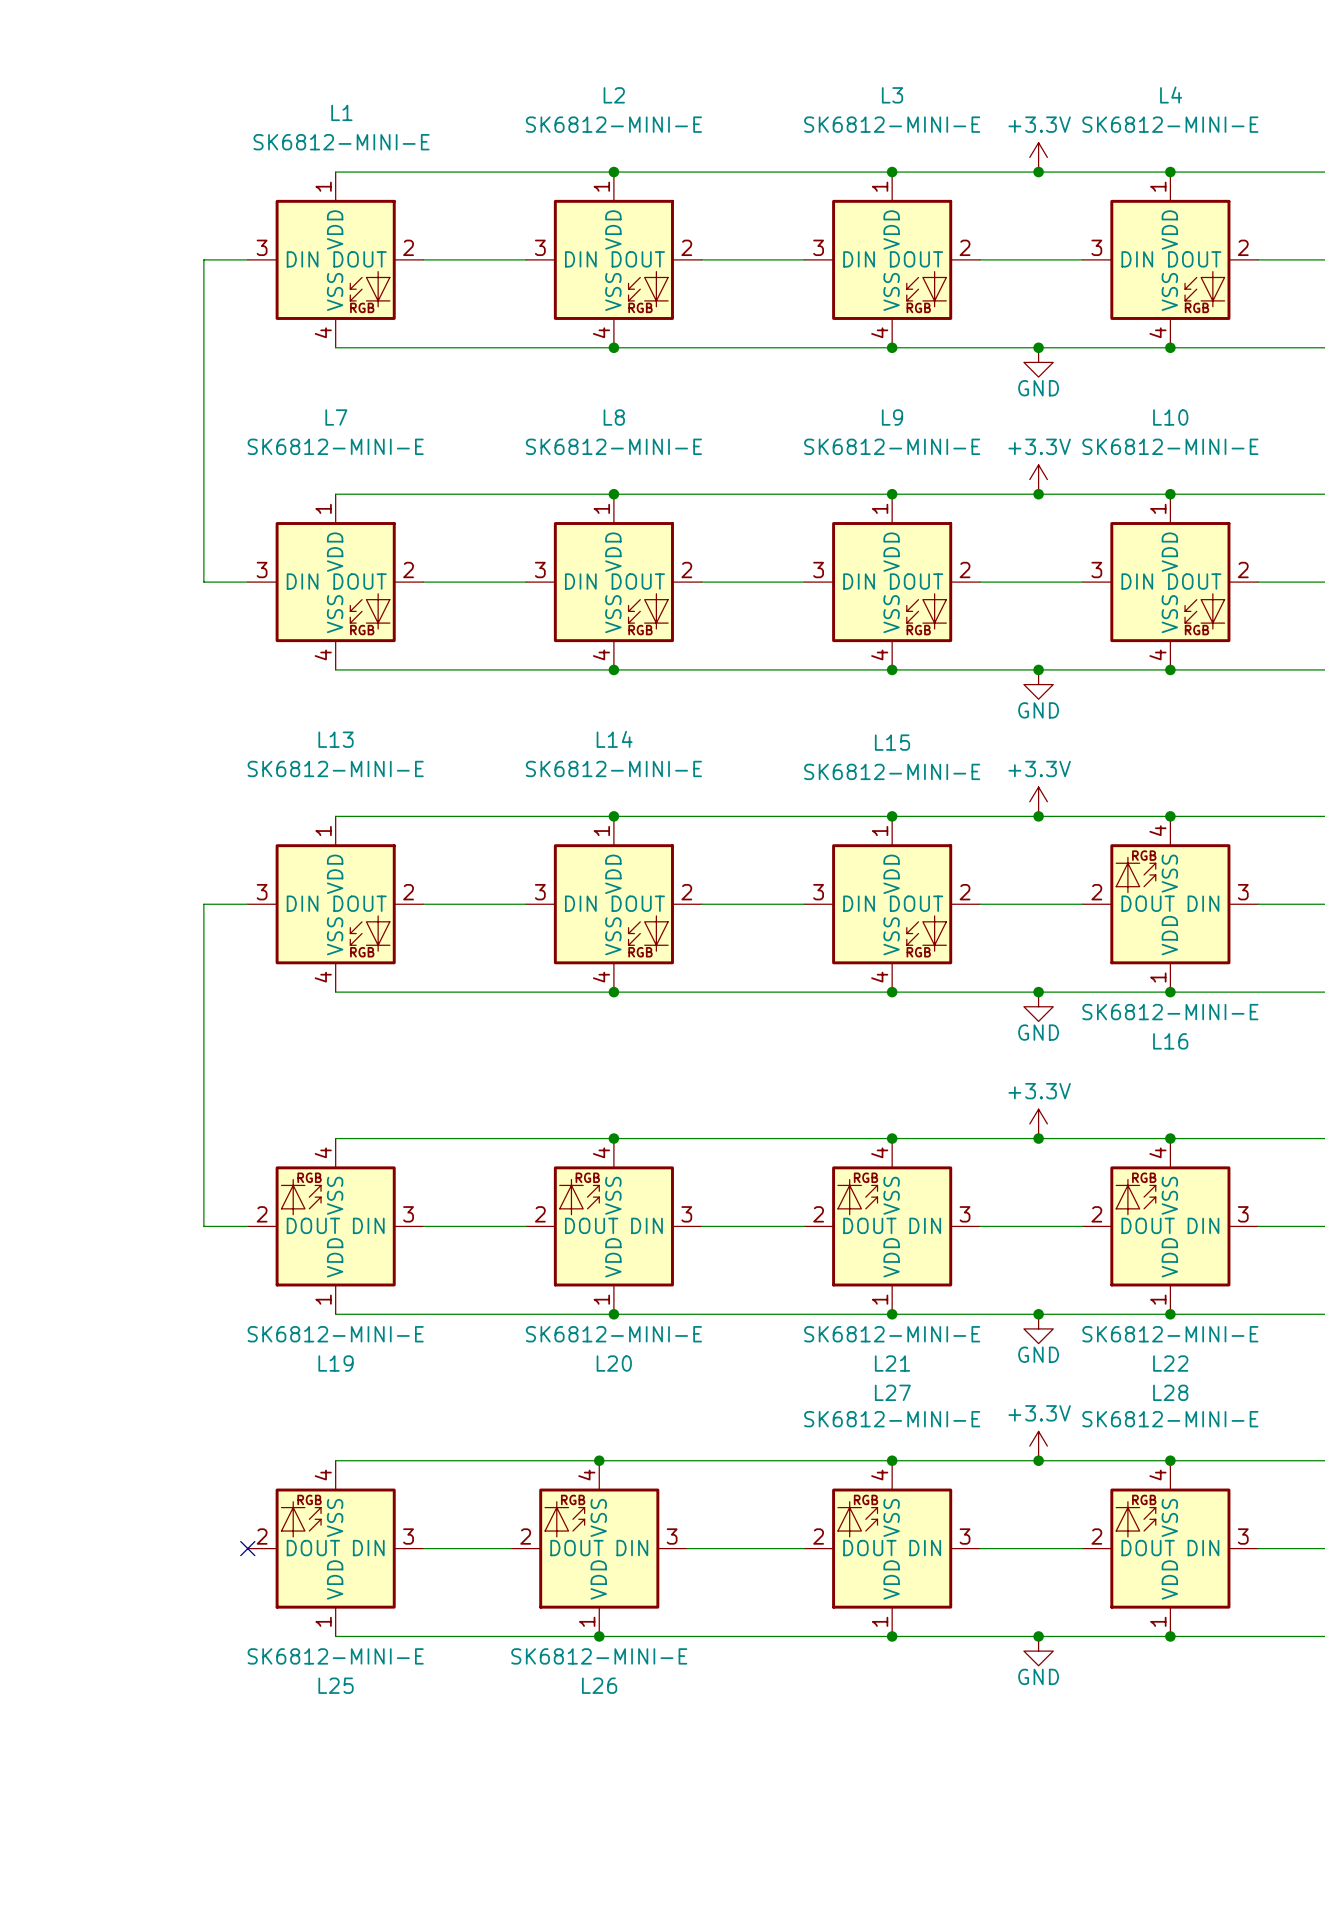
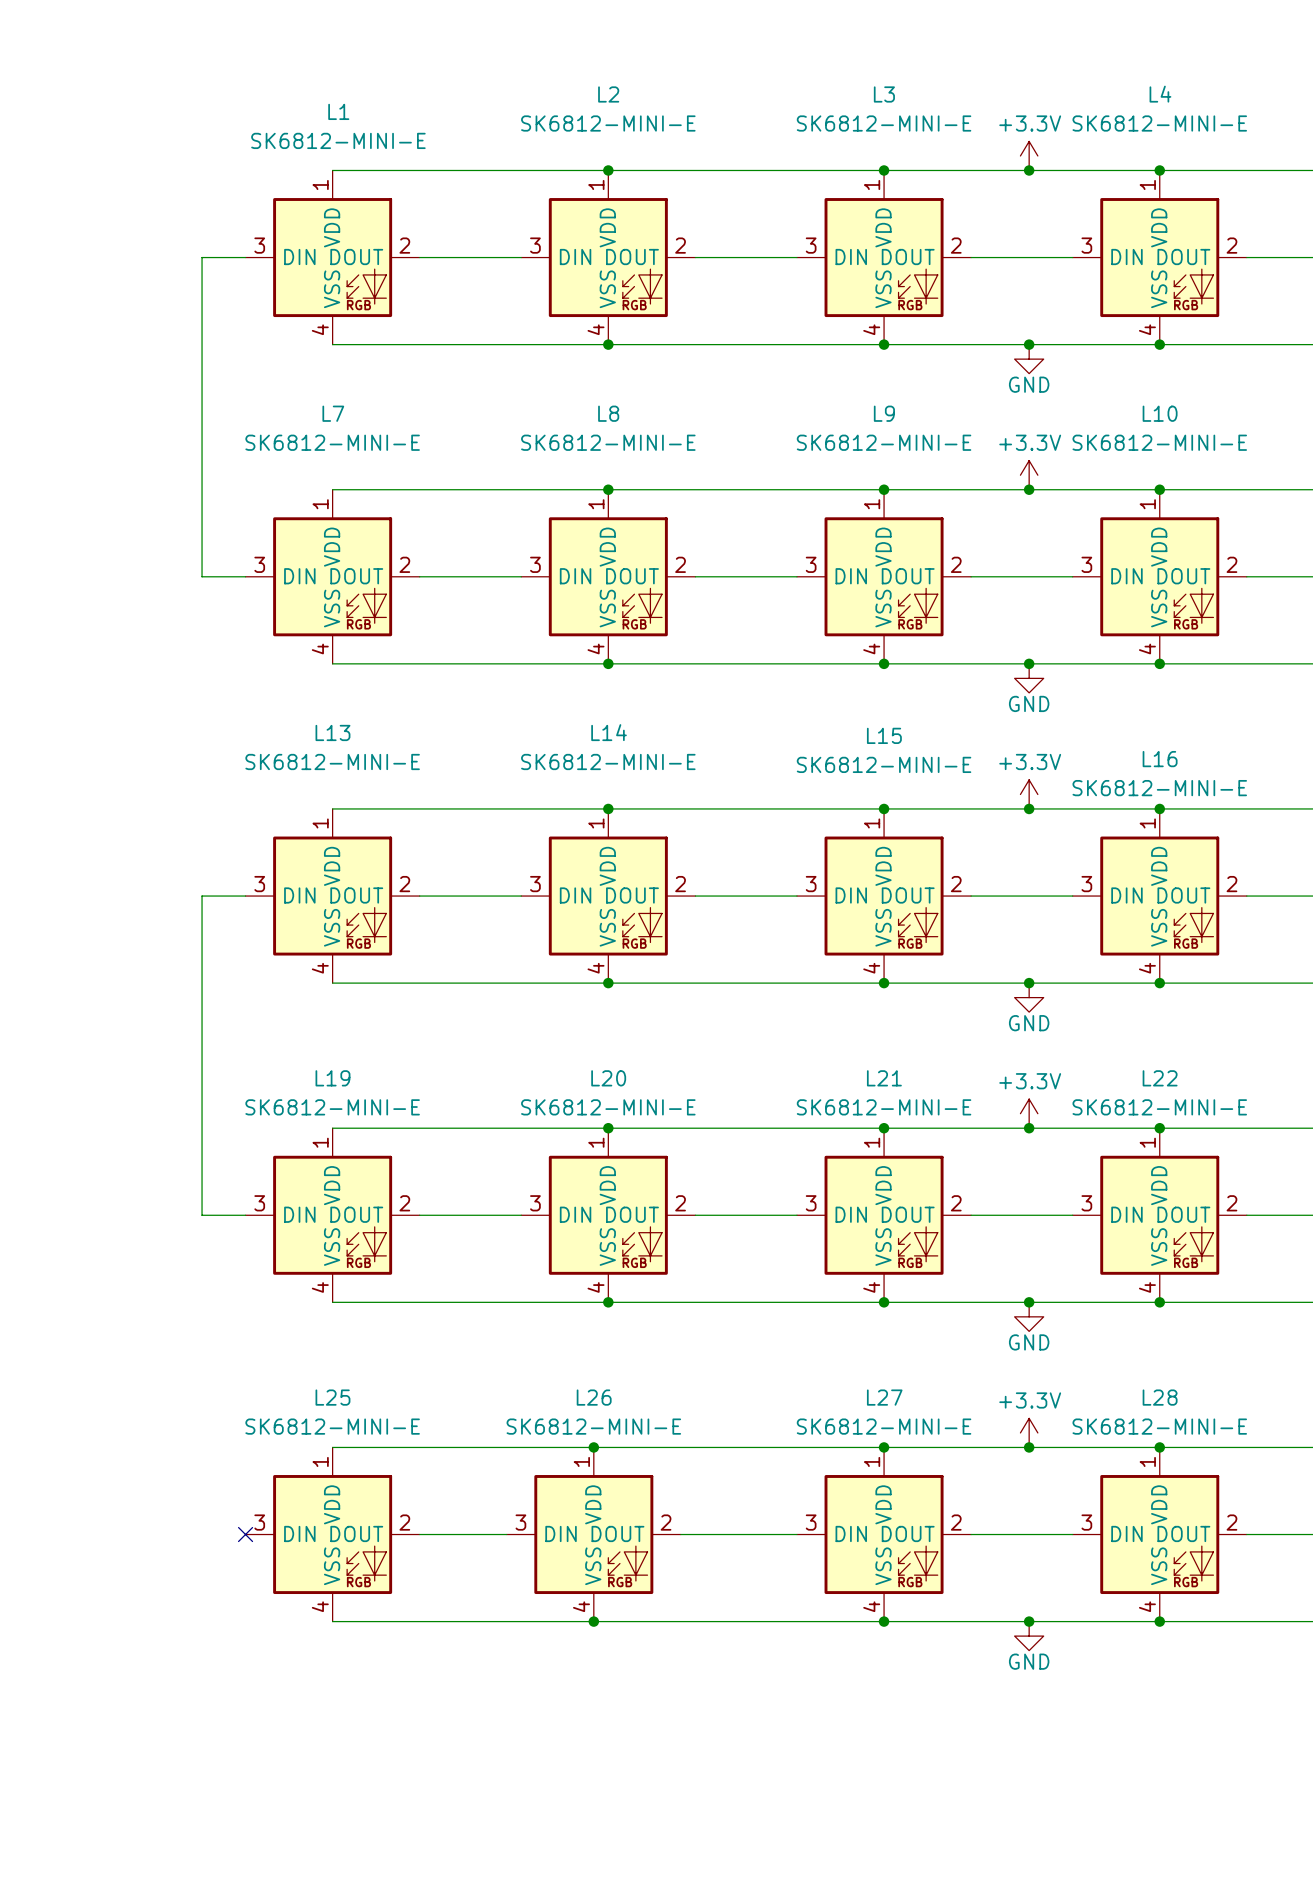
L16 rotation: 0° (1170, 904) -> 180° (1159, 896)
L19 rotation: 0° (335, 1226) -> 180° (332, 1215)
L20 rotation: 0° (613, 1226) -> 180° (608, 1215)
L21 rotation: 0° (892, 1226) -> 180° (884, 1215)
L22 rotation: 0° (1170, 1226) -> 180° (1159, 1215)
L25 rotation: 0° (335, 1548) -> 180° (332, 1534)
L26 rotation: 0° (599, 1548) -> 180° (593, 1534)
L27 rotation: 0° (892, 1548) -> 180° (884, 1534)
L28 rotation: 0° (1170, 1548) -> 180° (1159, 1534)

